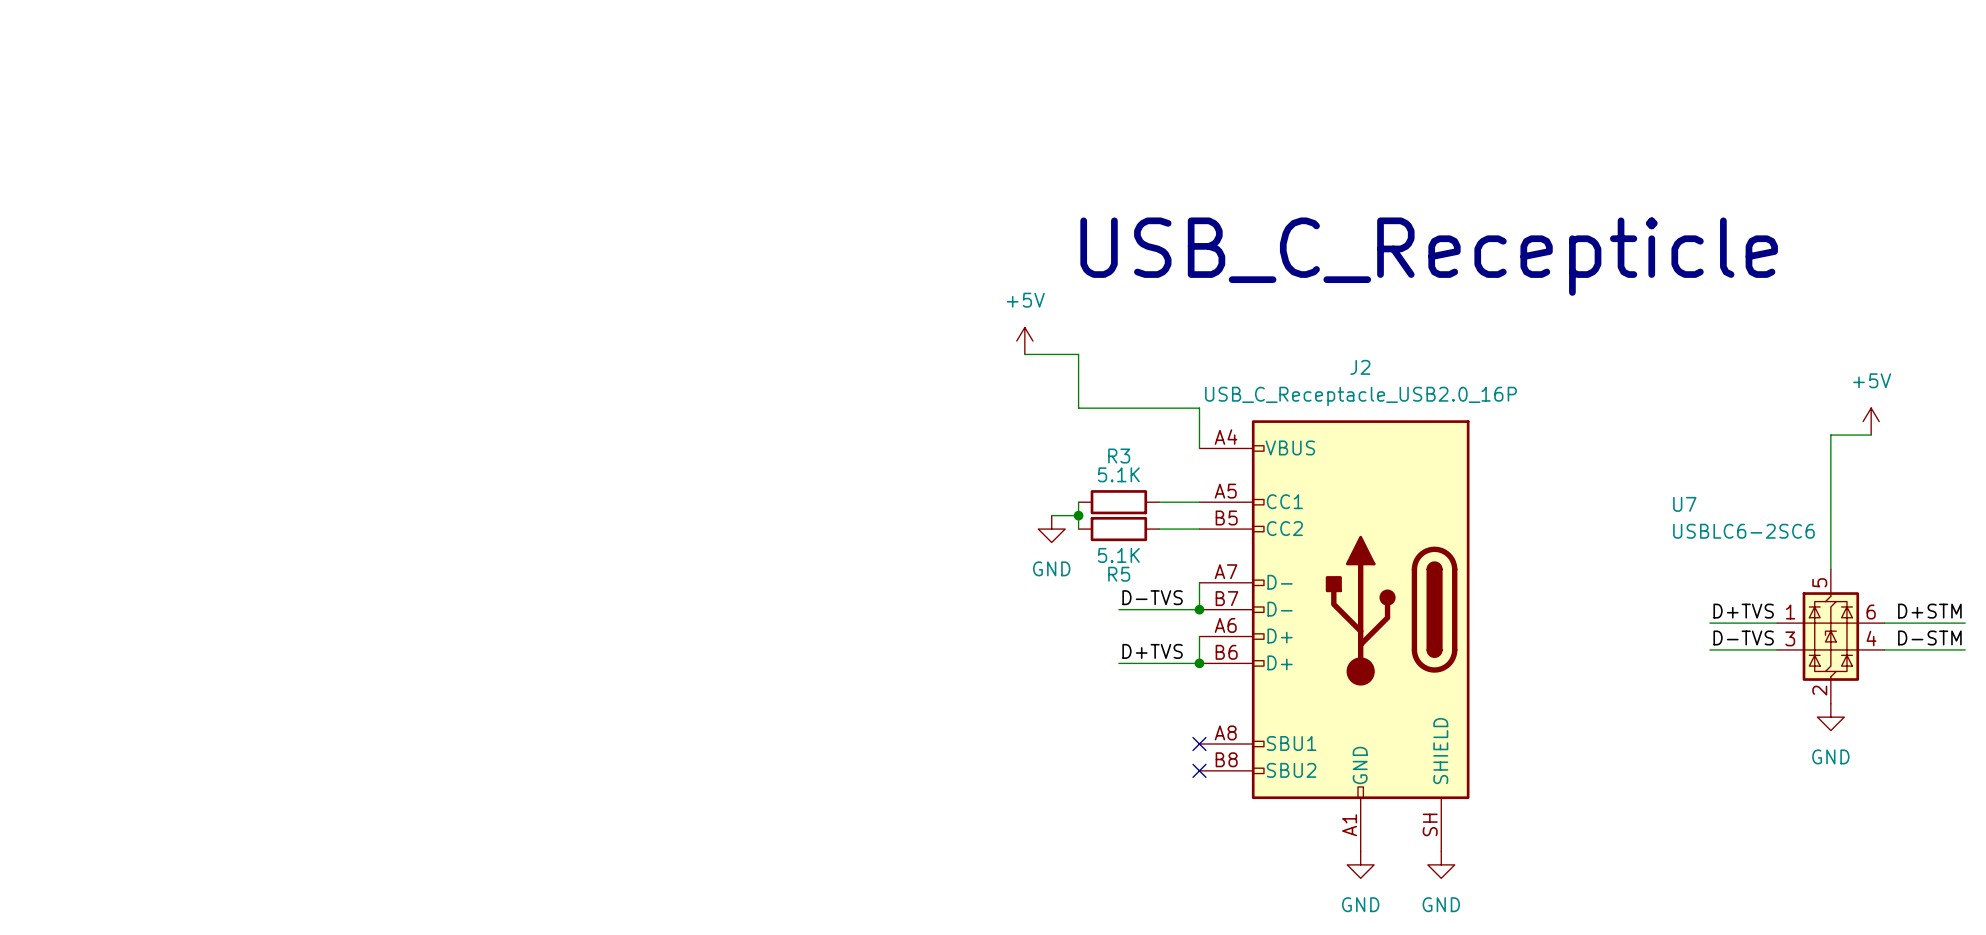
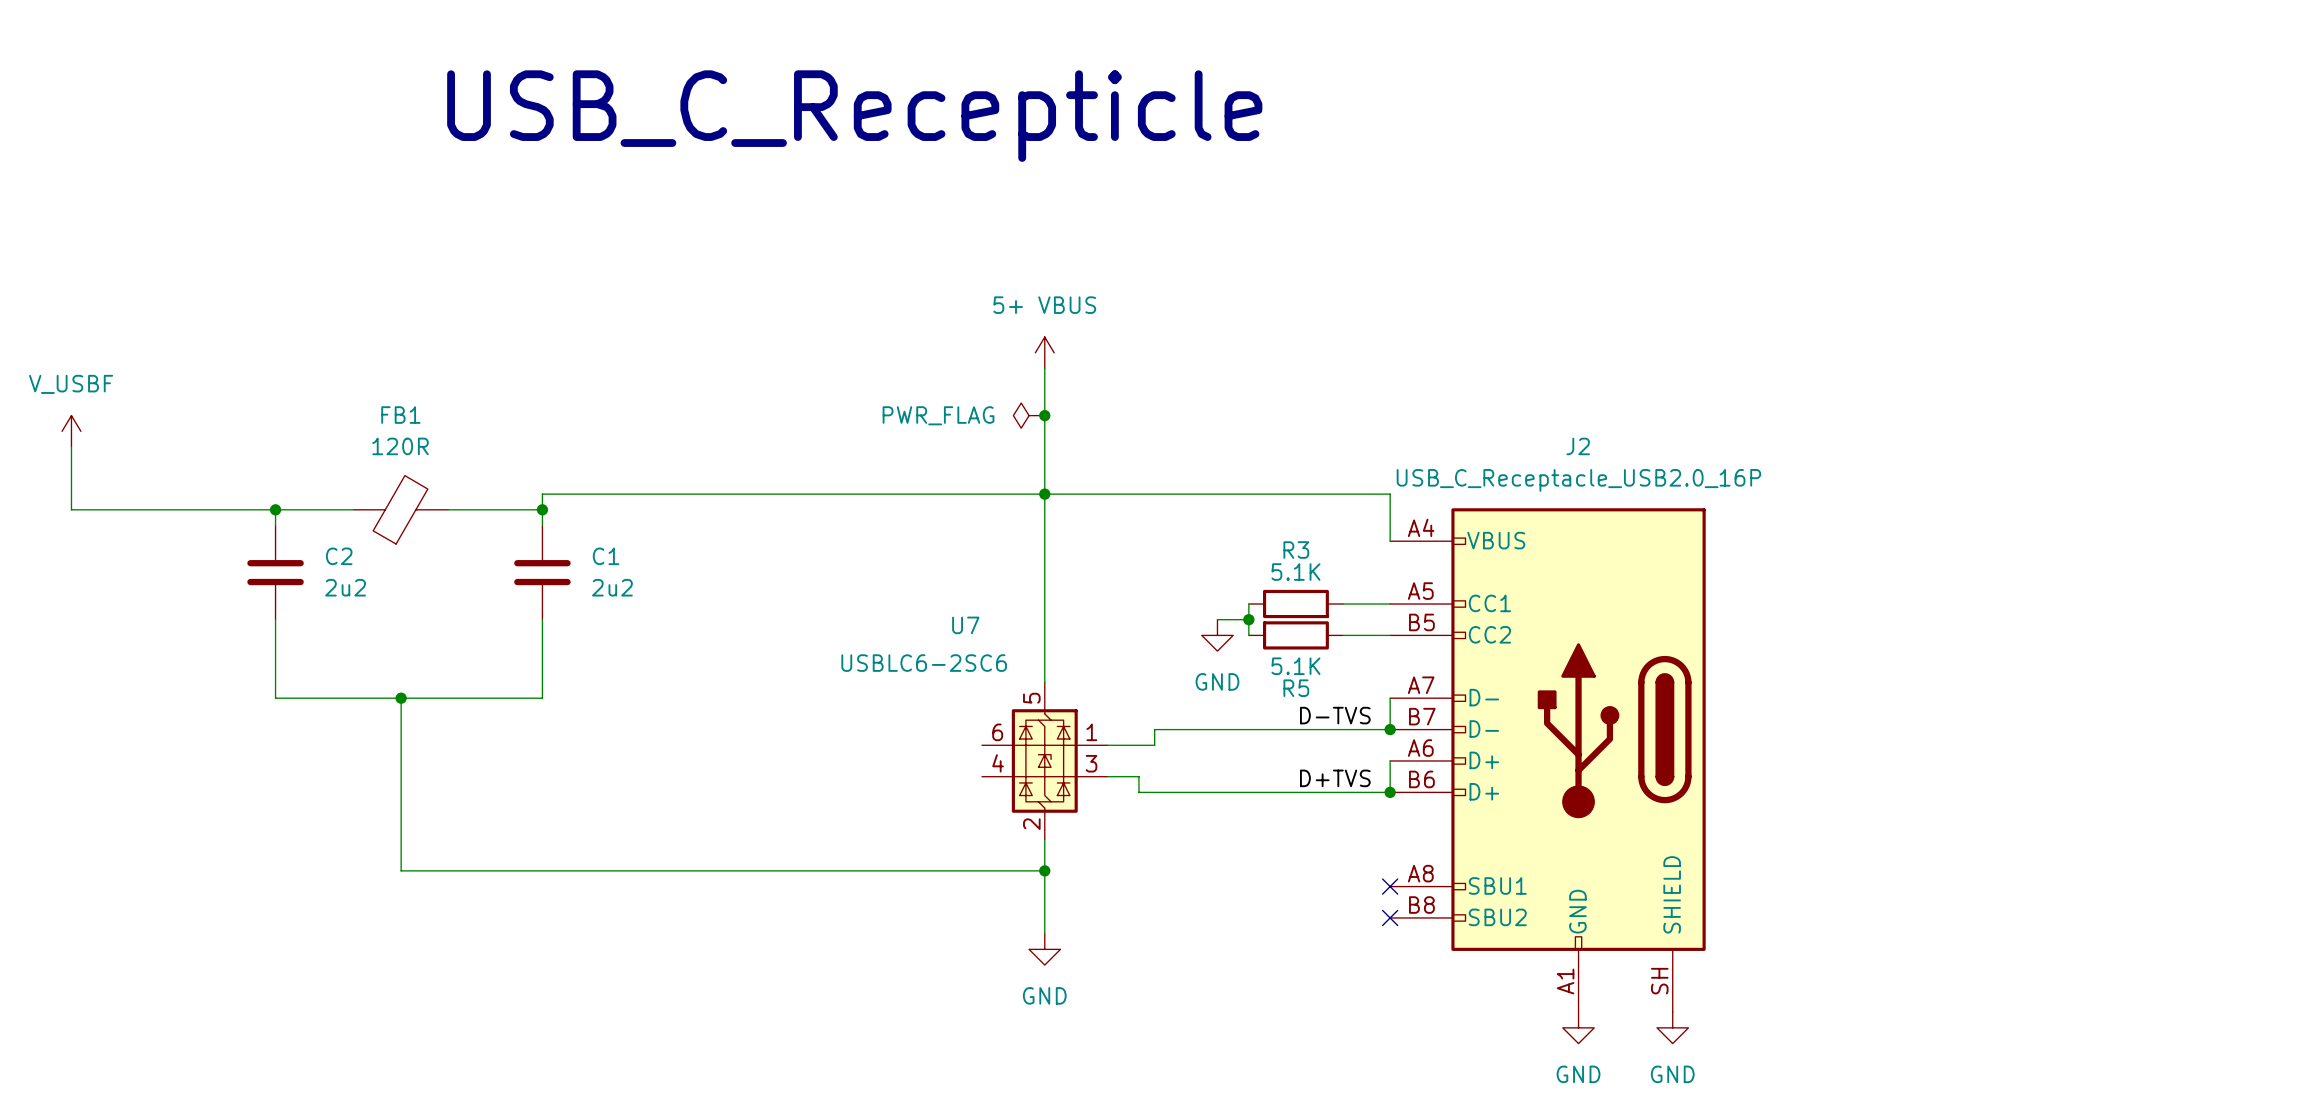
text: none -> USB_C_Recepticle (854, 116)
text: USB_C_Recepticle (1429, 256) -> none
power symbol: none -> 5+ VBUS (1044, 352)
wire: none -> (1044, 368) (1044, 682)
power symbol: none -> PWR_FLAG (1029, 415)
junction: none -> (1044, 415)
power symbol: +5V (1024, 340) -> none
power symbol: none -> V_USBF (71, 431)
wire: (1024, 354) (1078, 354) (1078, 408) -> (542, 525) (542, 494) (1248, 494)
wire: none -> (71, 447) (71, 509) (354, 509)
junction: none -> (1044, 494)
wire: none -> (275, 509) (275, 525)
junction: none -> (275, 509)
FB1: none -> 120R (401, 509)
wire: none -> (448, 509) (542, 509)
junction: none -> (542, 509)
power symbol: +5V (1871, 421) -> none
wire: (1871, 435) (1830, 435) (1830, 569) -> none
C2: none -> 2u2 (275, 572)
C1: none -> 2u2 (542, 572)
U7 name position: U7 (1684, 504) -> U7 (965, 625)
wire: none -> (275, 619) (275, 698) (542, 698) (542, 619)
U7 value position: USBLC6-2SC6 (1743, 531) -> USBLC6-2SC6 (924, 663)
wire: none -> (401, 698) (401, 870) (1044, 870)
junction: none -> (401, 698)
wire: none -> (1295, 729) (1154, 729) (1154, 745) (1107, 745)
label: D+TVS (1743, 611) -> none
label: D+STM (1929, 611) -> none
wire: (1709, 623) (1777, 623) -> none
wire: (1884, 623) (1965, 623) -> none
U7 flip: as is (1830, 636) -> left-right (1044, 760)
U7 position: (1830, 636) -> (1044, 760)
label: D-TVS (1743, 637) -> none
label: D-STM (1929, 637) -> none
wire: none -> (1107, 776) (1138, 776) (1138, 792) (1295, 792)
wire: (1709, 649) (1777, 649) -> none
wire: (1884, 649) (1965, 649) -> none
wire: none -> (1044, 839) (1044, 933)
power symbol: GND (1830, 717) -> none
junction: none -> (1044, 870)
power symbol: none -> GND (1044, 949)

